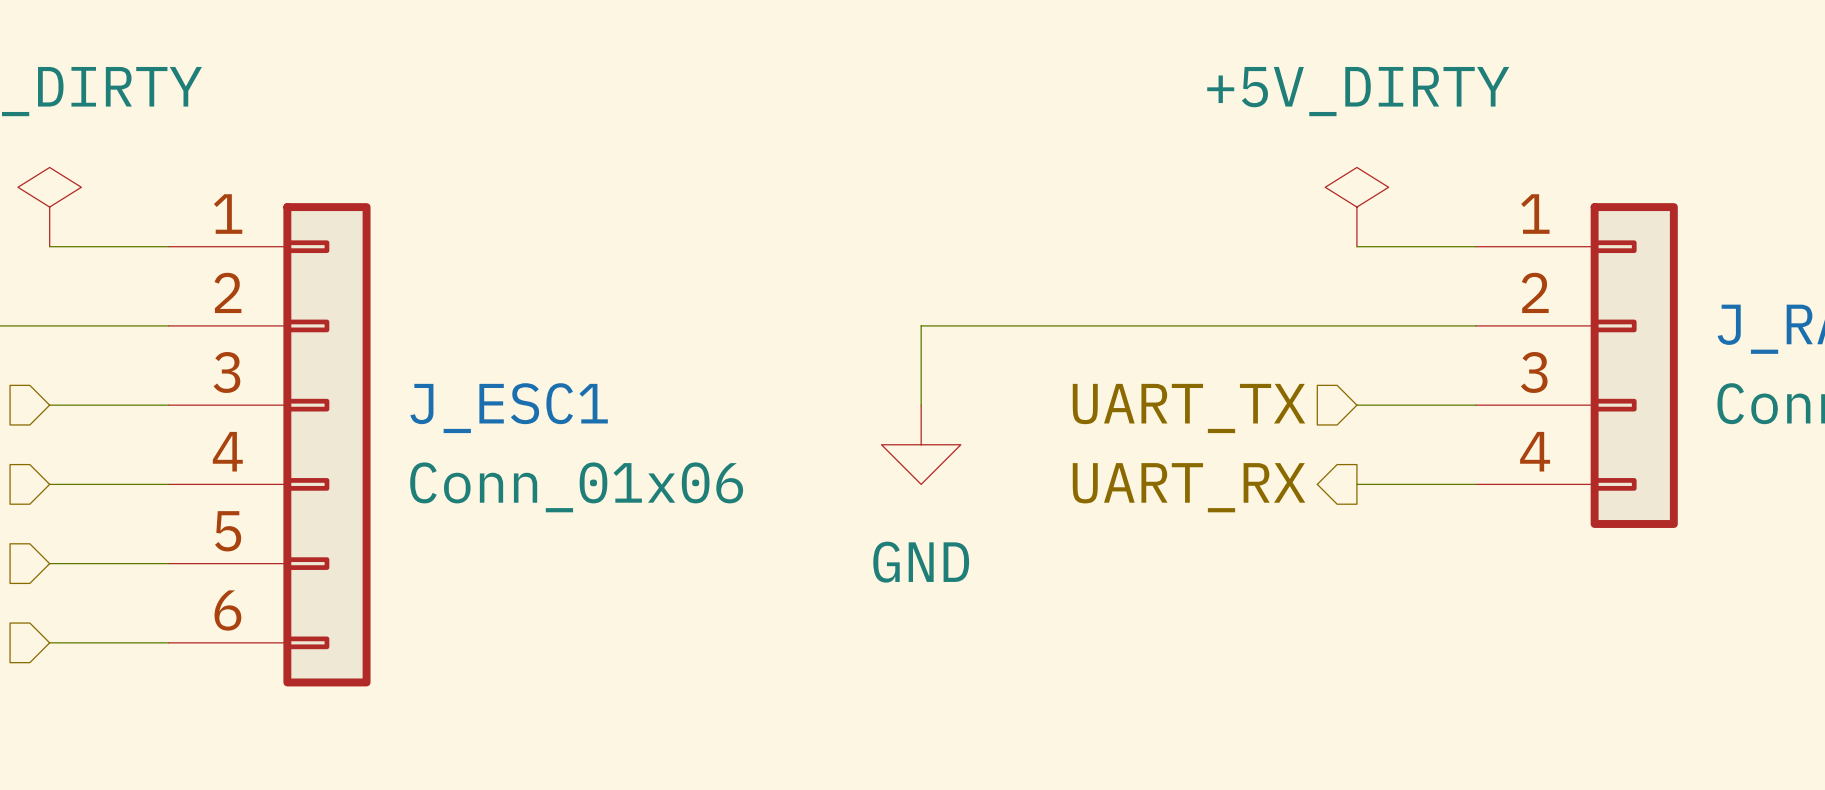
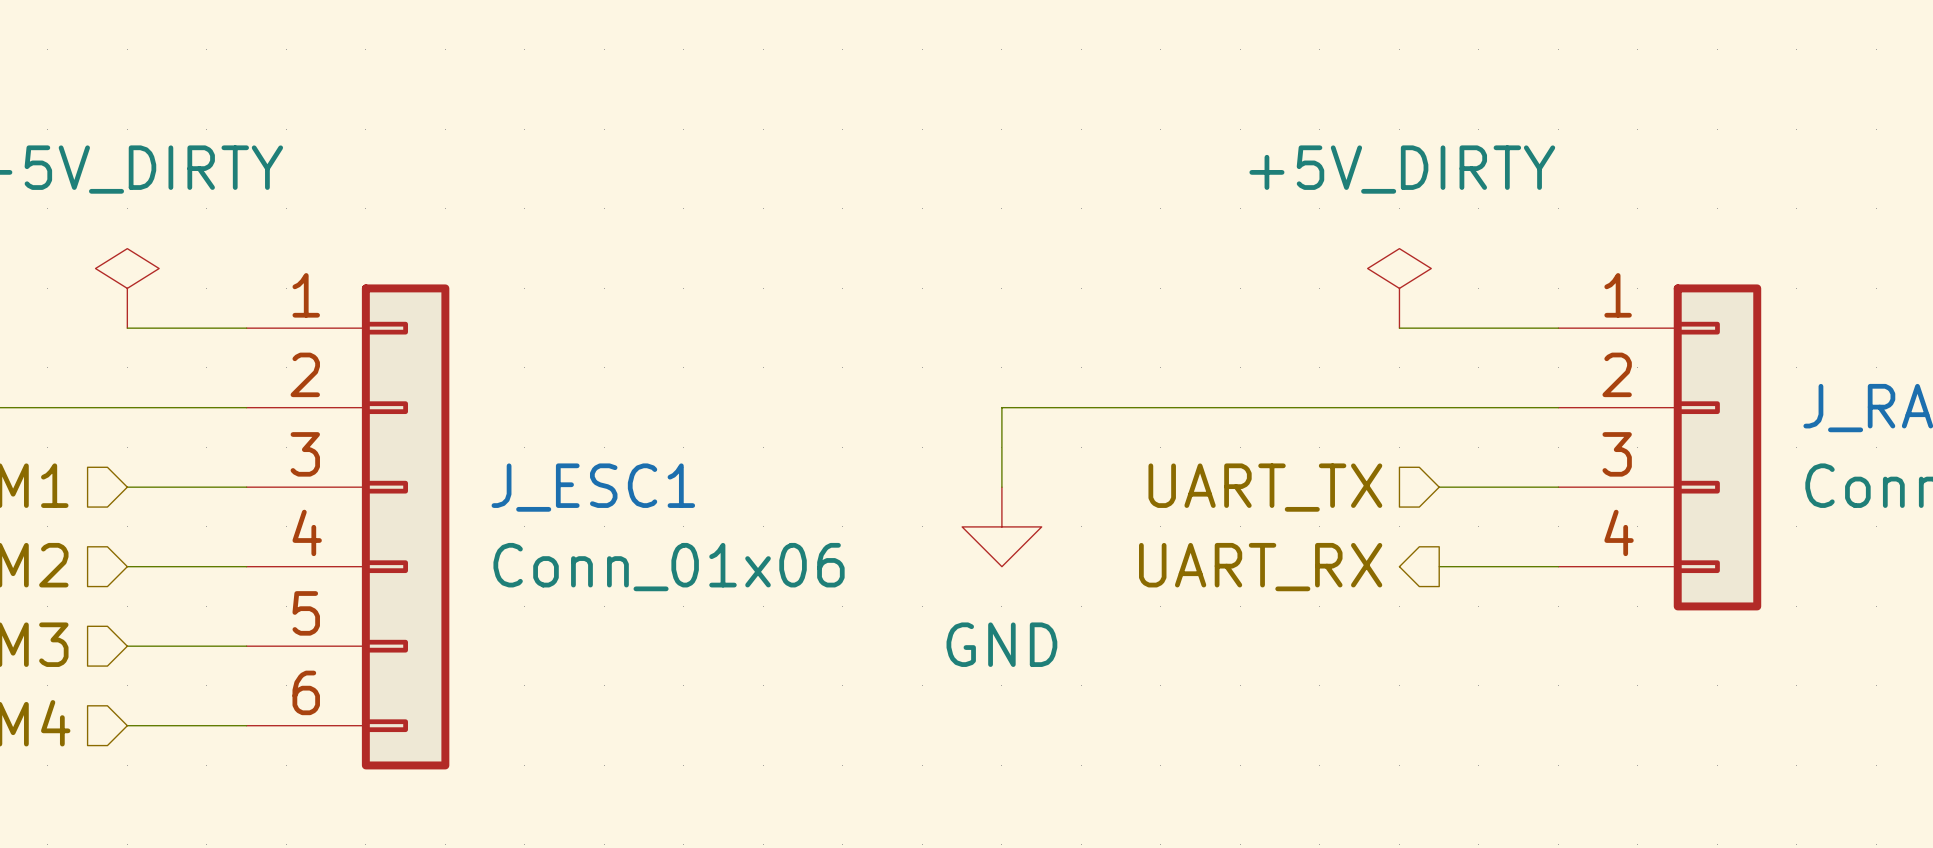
power symbol position: +5V_DIRTY (1356, 207) -> +5V_DIRTY (1399, 288)
wire: none -> (1399, 328) (1439, 328)

